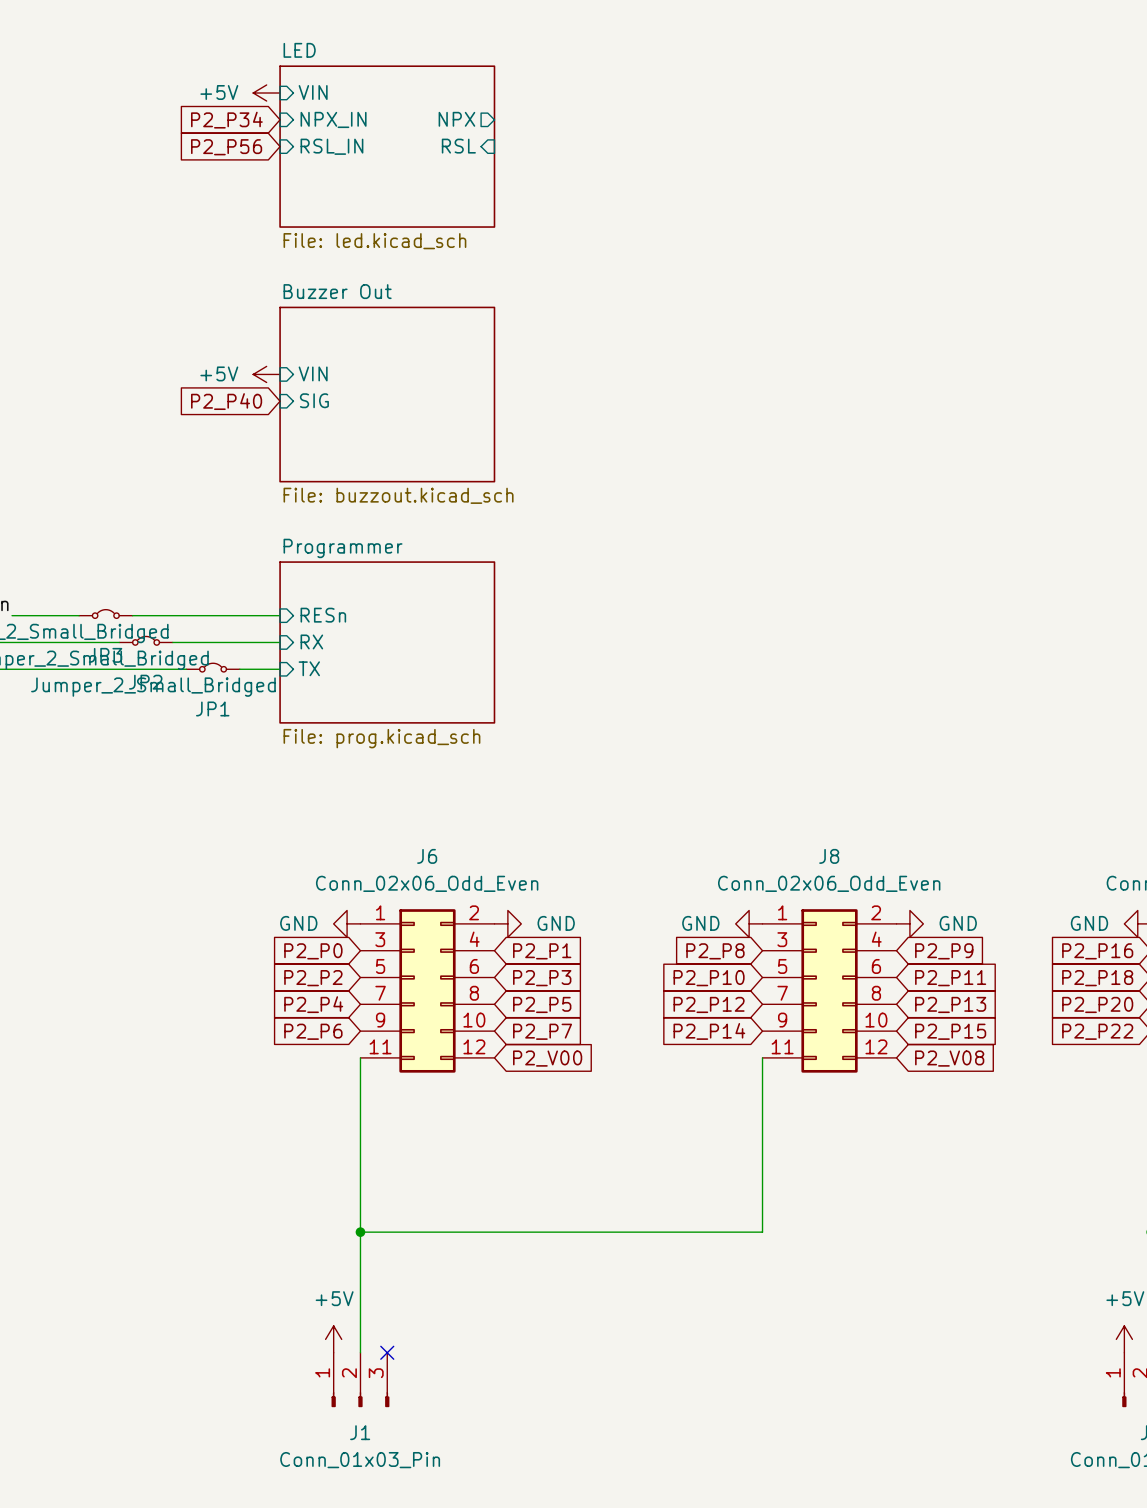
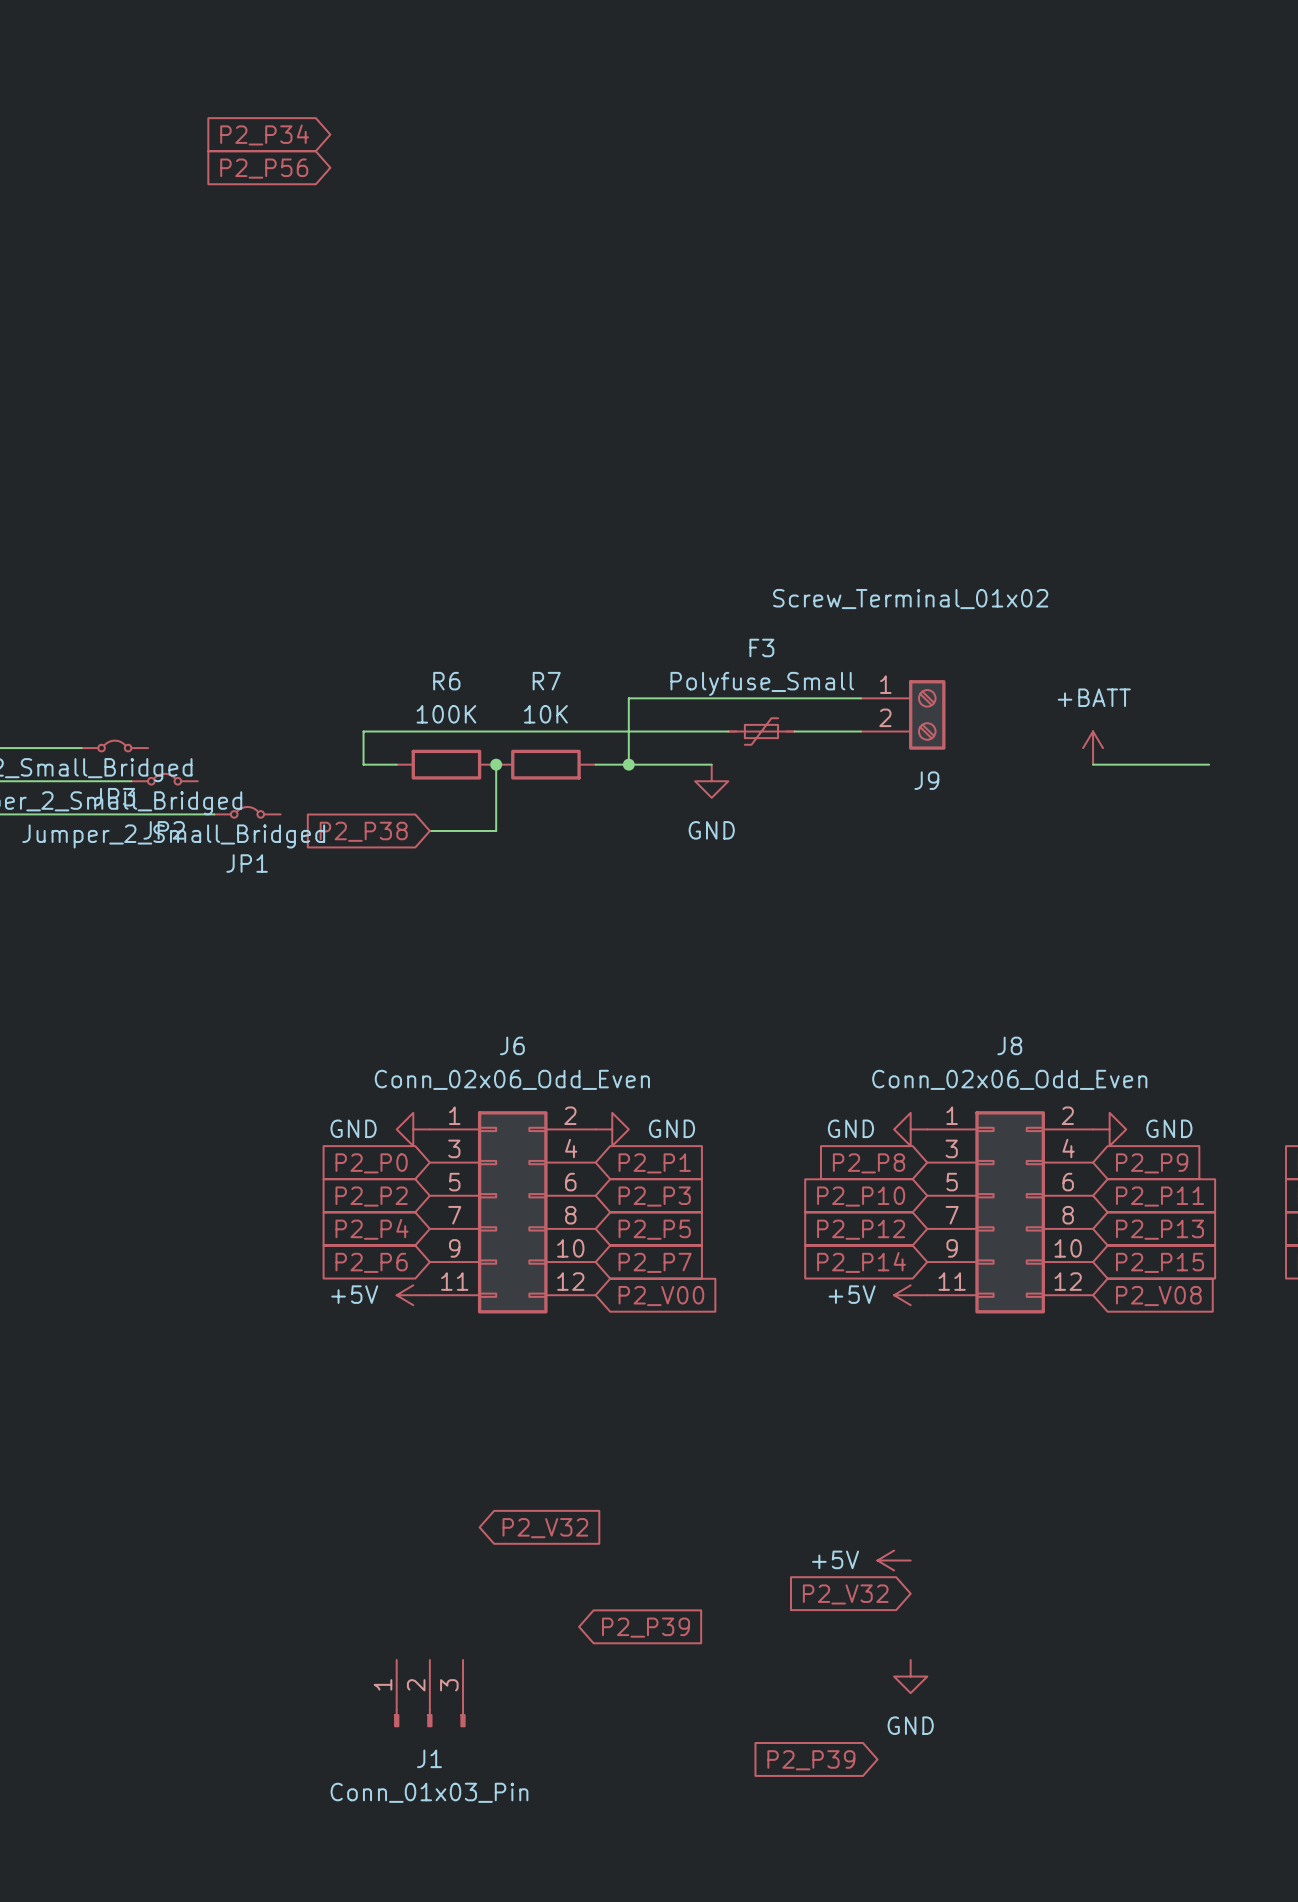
sheet pin: VIN (313, 92) -> none
power symbol: +5V (266, 93) -> none
sheet pin: NPX_IN (333, 119) -> none
sheet pin: NPX (456, 119) -> none
sheet pin: RSL_IN (331, 146) -> none
sheet LED: File: led.kicad_sch (387, 146) -> none
sheet pin: RSL (458, 146) -> none
sheet pin: VIN (313, 373) -> none
power symbol: +5V (266, 374) -> none
sheet Buzzer Out: File: buzzout.kicad_sch (387, 394) -> none
sheet pin: SIG (314, 400) -> none
global label: P2_P40 (226, 401) -> none
wire: none -> (860, 698) (628, 698) (628, 764)
J9: none -> Screw_Terminal_01x02 (903, 714)
wire: none -> (728, 731) (363, 731) (363, 764) (396, 764)
F3: none -> Polyfuse_Small (761, 731)
wire: none -> (794, 731) (860, 731)
wire: (132, 615) (280, 615) -> none
sheet pin: RESn (323, 615) -> none
power symbol: none -> +BATT (1093, 748)
R6: none -> 100K (446, 764)
wire: none -> (496, 764) (496, 830) (429, 830)
junction: none -> (496, 764)
R7: none -> 10K (545, 764)
wire: none -> (595, 764) (711, 764)
junction: none -> (628, 764)
wire: none -> (1093, 764) (1209, 764)
sheet pin: RX (311, 641) -> none
wire: (172, 642) (280, 642) -> none
sheet Programmer: File: prog.kicad_sch (387, 642) -> none
power symbol: none -> GND (711, 781)
sheet pin: TX (309, 668) -> none
wire: (239, 669) (280, 669) -> none
global label: none -> P2_P38 (363, 831)
power symbol: none -> +5V (413, 1295)
wire: (360, 1057) (360, 1352) -> none
power symbol: none -> +5V (910, 1295)
wire: (762, 1057) (762, 1232) (360, 1232) -> none
junction: (360, 1232) -> none
global label: none -> P2_V32 (545, 1528)
power symbol: none -> +5V (894, 1560)
global label: none -> P2_V32 (845, 1594)
global label: none -> P2_P39 (646, 1627)
power symbol: +5V (333, 1339) -> none
no-connect mark: (387, 1352) -> none
power symbol: none -> GND (910, 1676)
global label: none -> P2_P39 (811, 1760)

